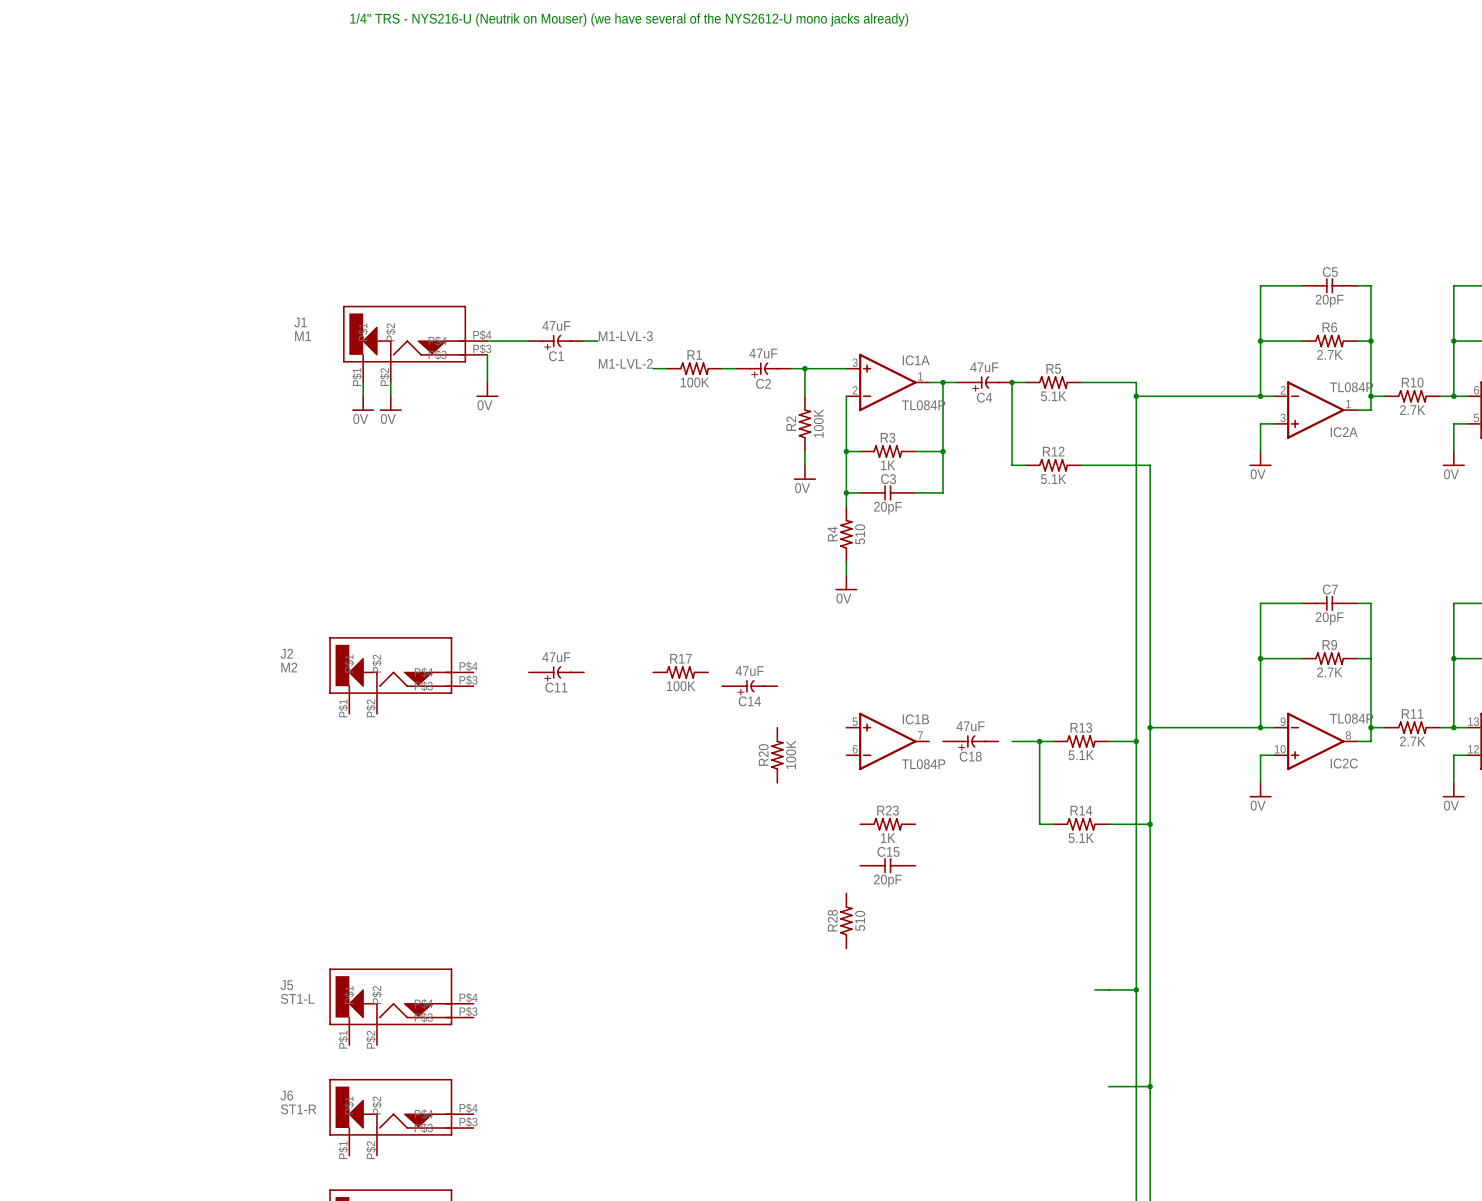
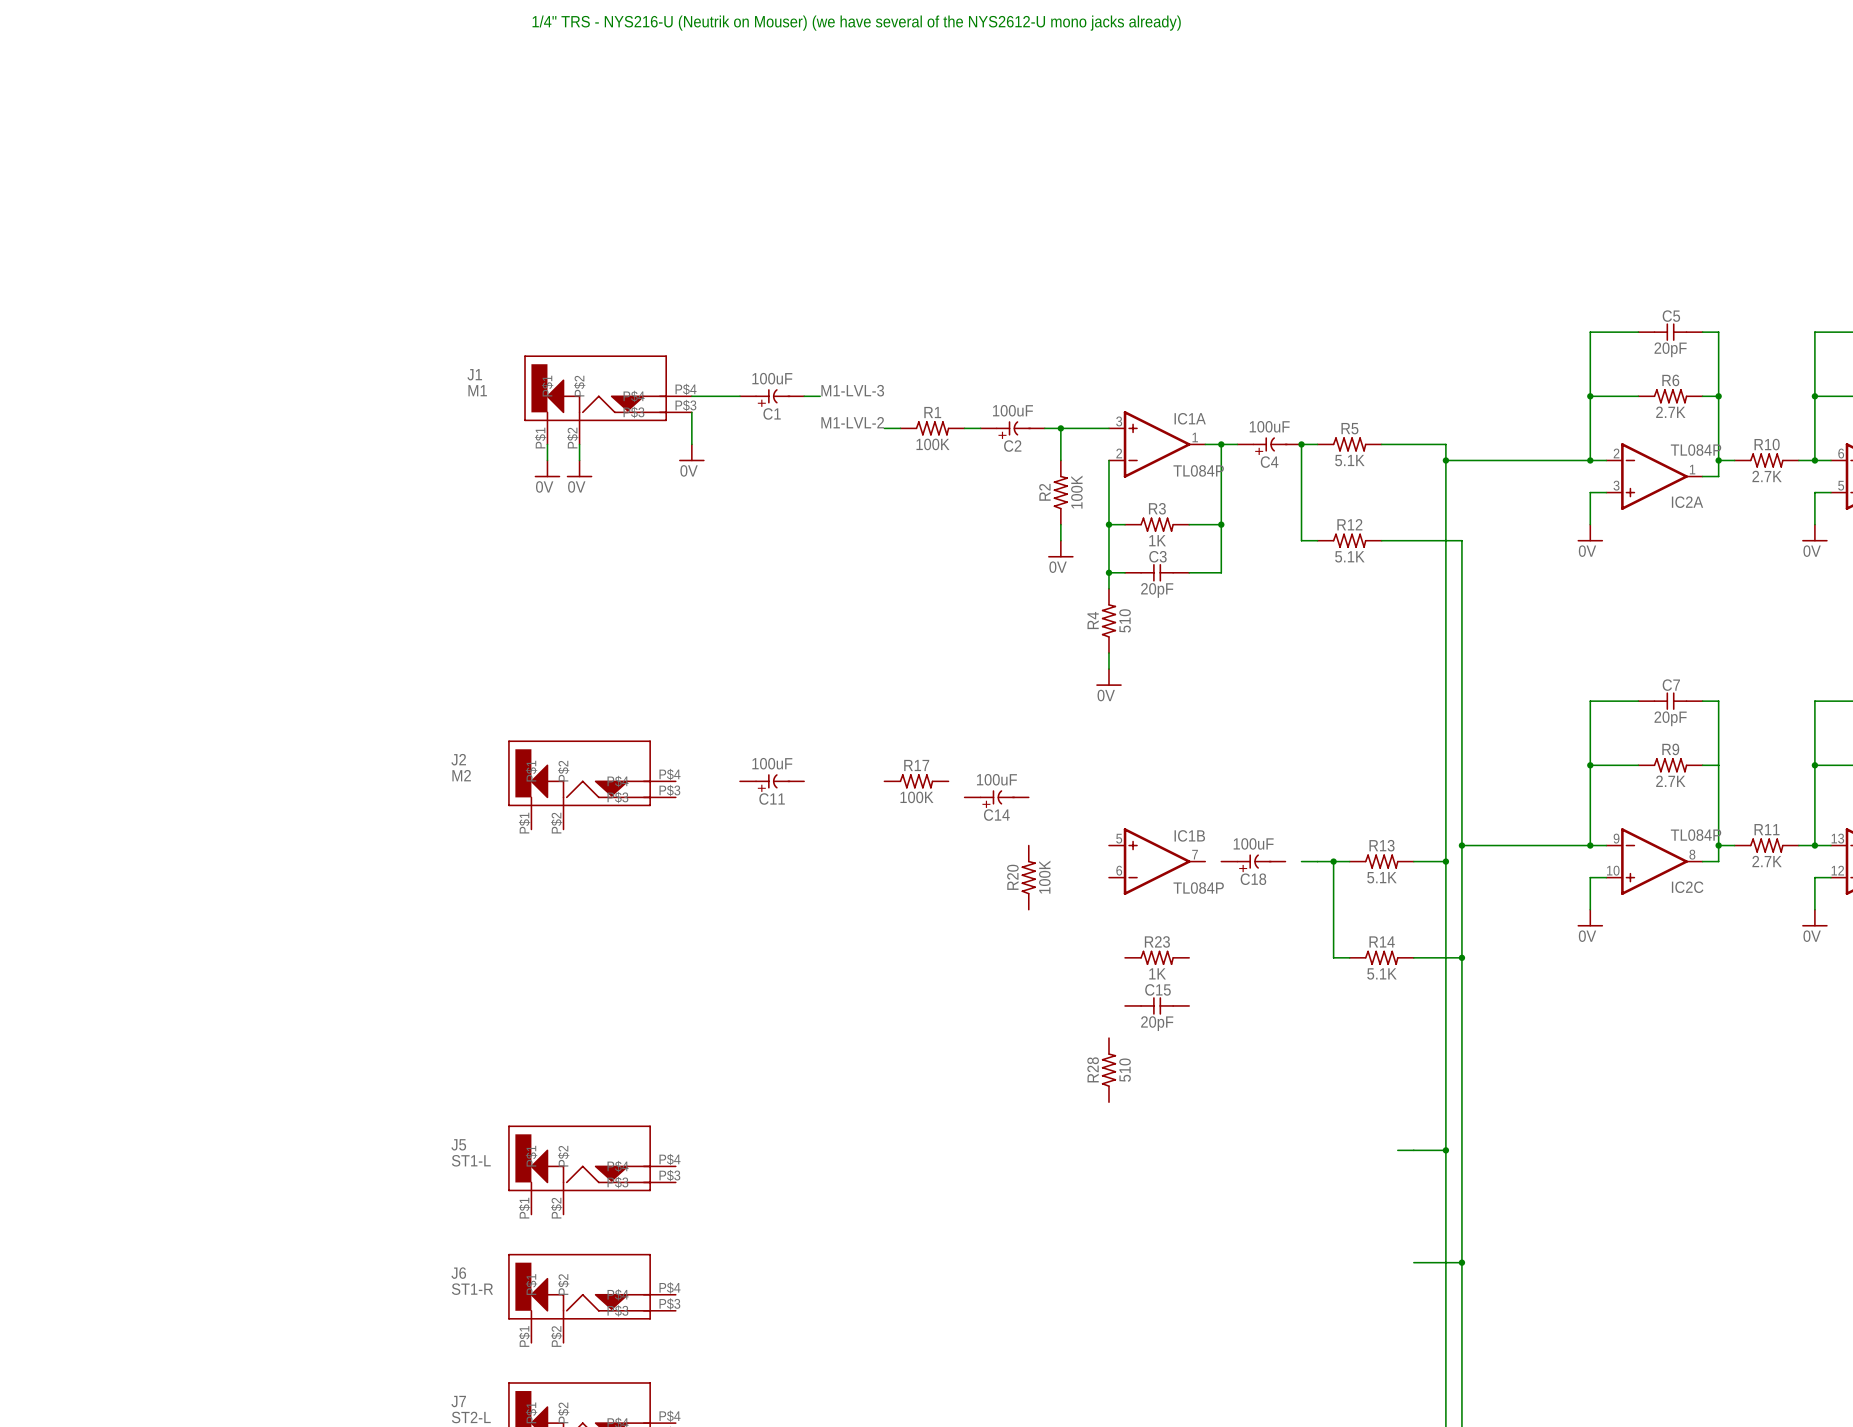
C1 value: 47uF (556, 325) -> 100uF (772, 378)
C2 value: 47uF (763, 353) -> 100uF (1012, 410)
C4 value: 47uF (984, 367) -> 100uF (1269, 426)
C11 value: 47uF (556, 657) -> 100uF (772, 763)
C14 value: 47uF (749, 671) -> 100uF (996, 779)
C18 value: 47uF (970, 726) -> 100uF (1253, 843)

